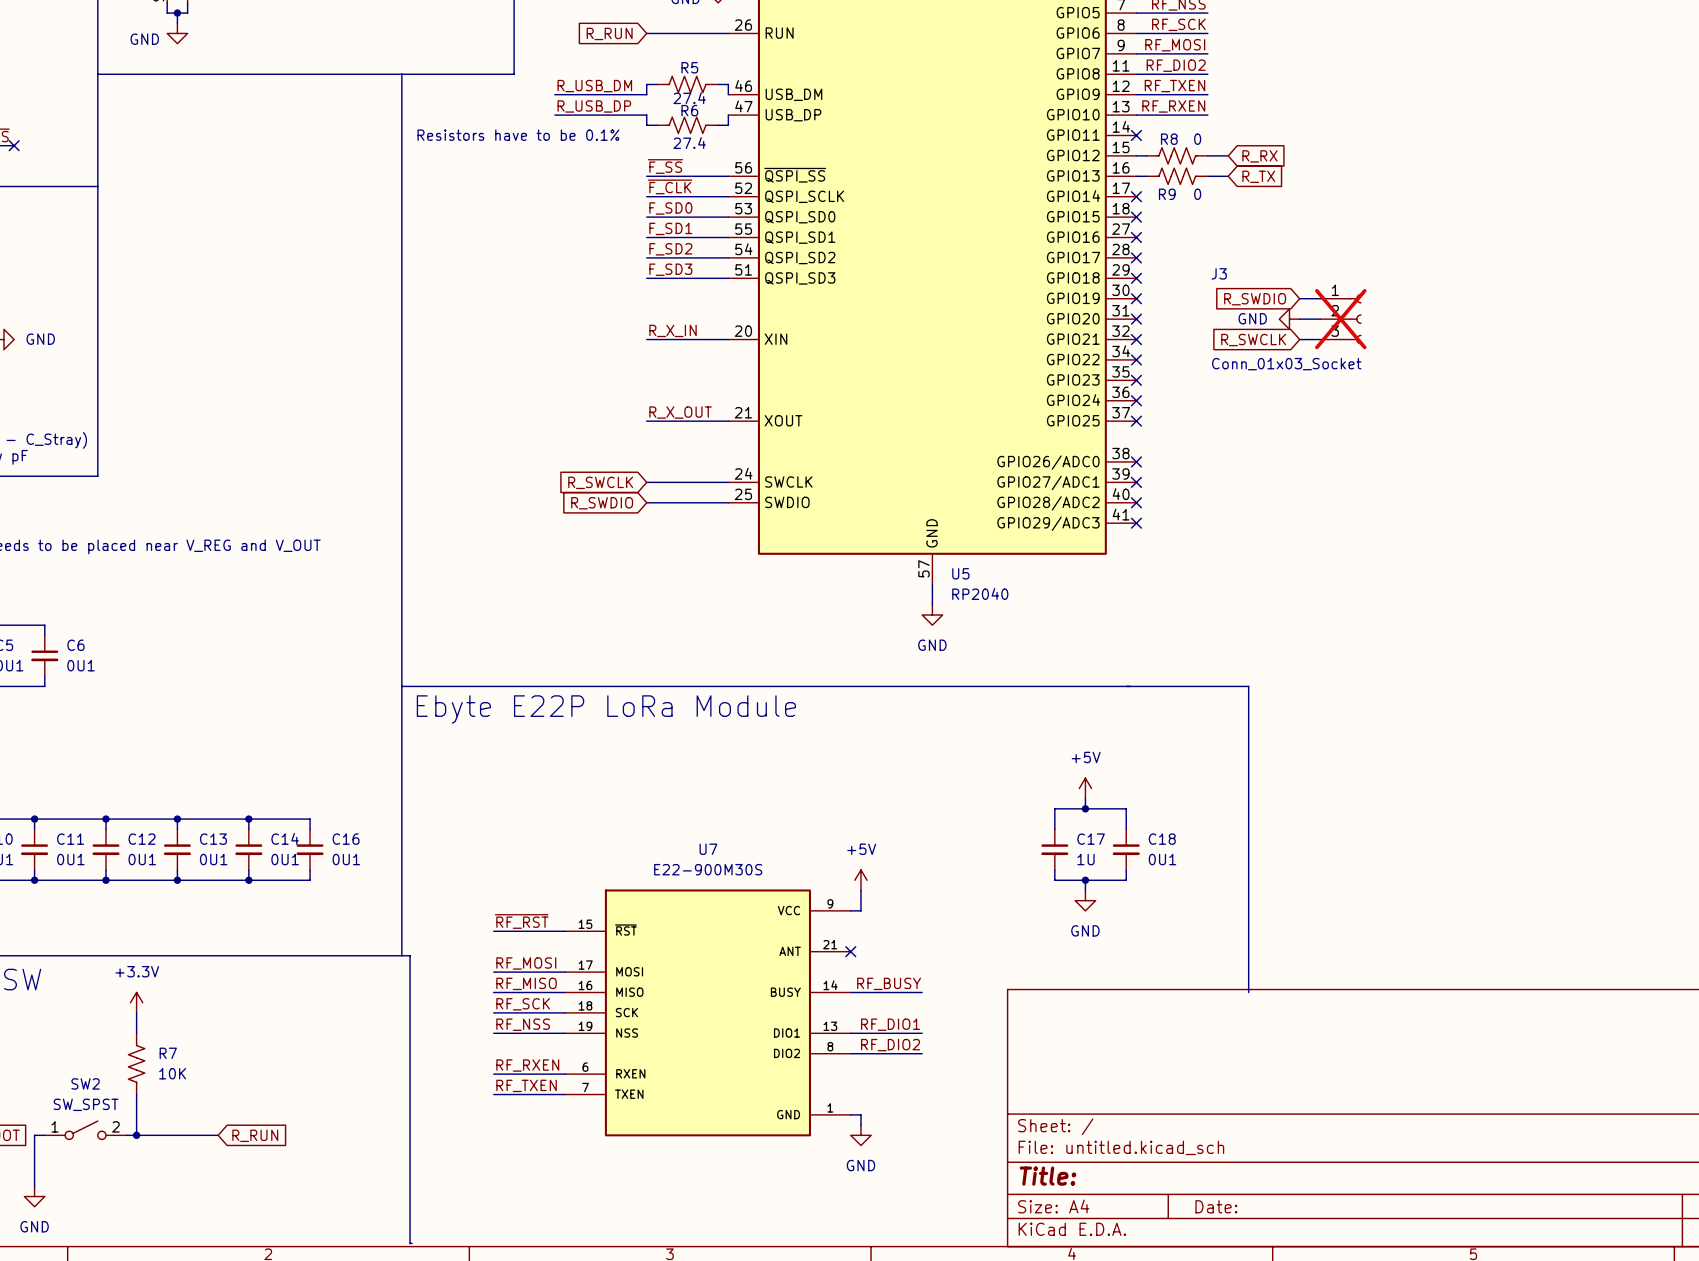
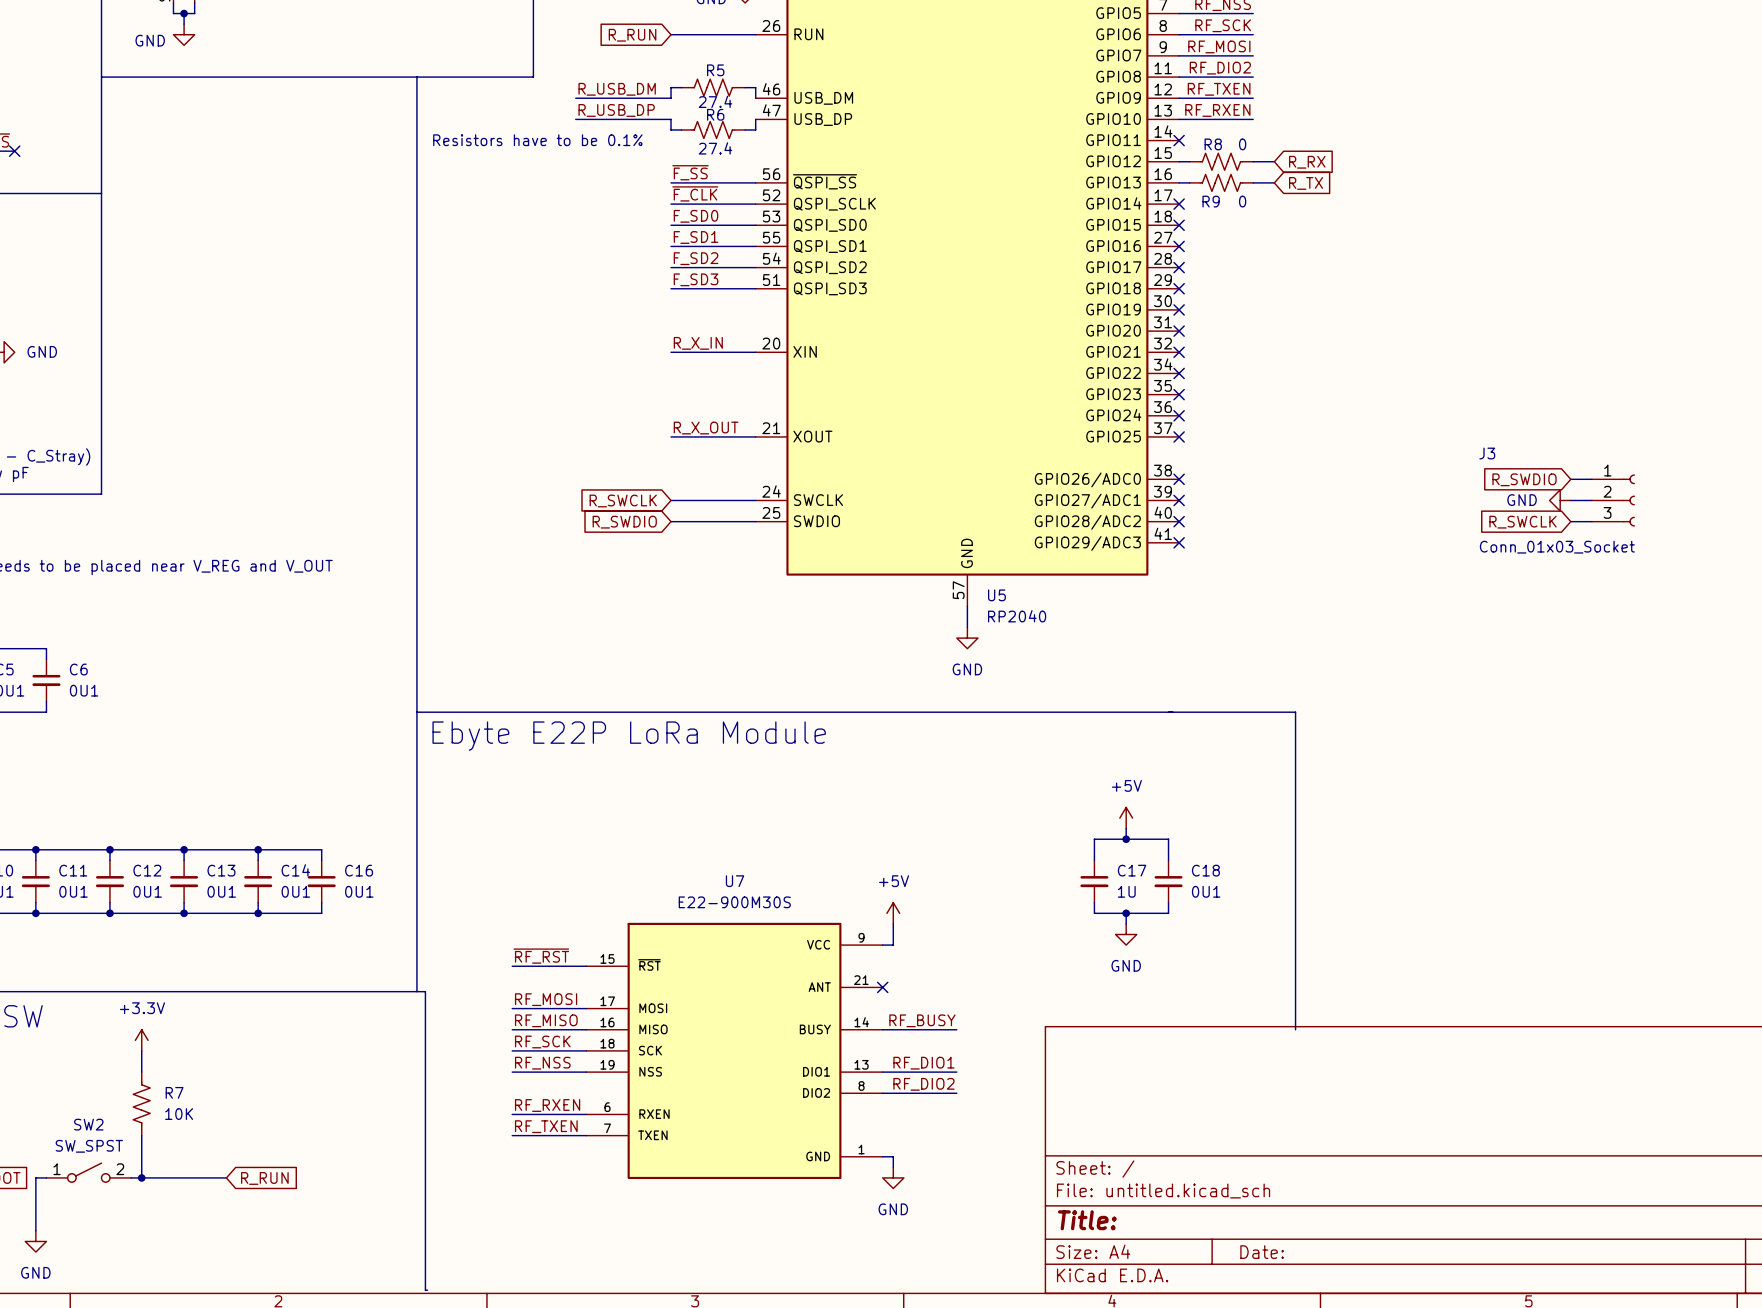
wire: (1299, 298) (1320, 298) -> none
global label: R_SWDIO (1255, 299) -> none
power symbol: GND (1289, 319) -> none
wire: (1299, 319) (1320, 319) -> none
J3 position: (1340, 319) -> (1613, 500)
J3 do-not-place cross: (1340, 319) -> none
wire: (1299, 339) (1320, 339) -> none
global label: R_SWCLK (1253, 340) -> none
wire: none -> (1570, 479) (1591, 479)
global label: none -> R_SWDIO (1524, 479)
power symbol: none -> GND (1560, 500)
wire: none -> (1570, 500) (1591, 500)
wire: none -> (1570, 521) (1591, 521)
global label: none -> R_SWCLK (1523, 522)

